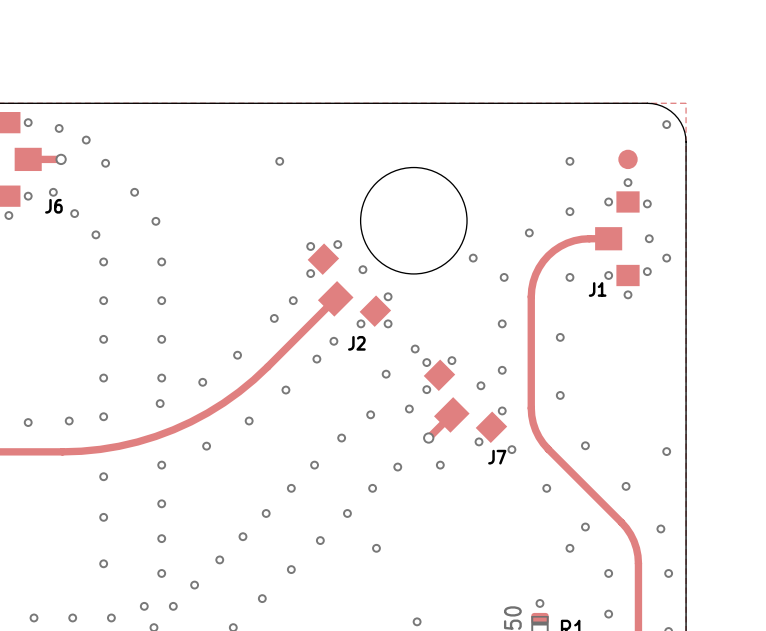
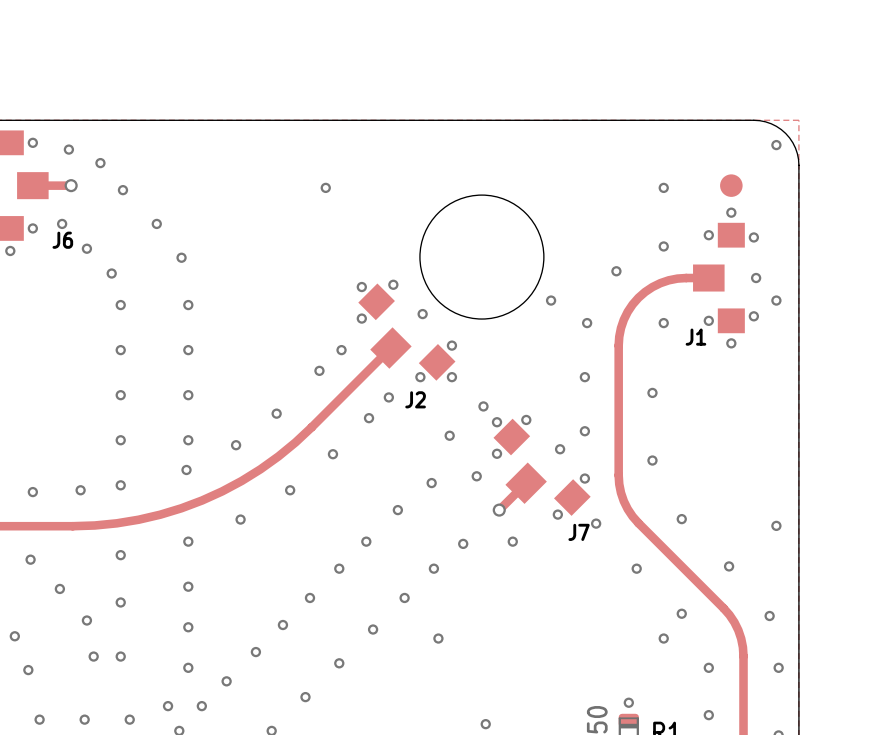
via: none -> (30, 559)
via: none -> (59, 588)
via: none -> (86, 620)
via: none -> (14, 636)
via: none -> (93, 656)
via: none -> (28, 670)

